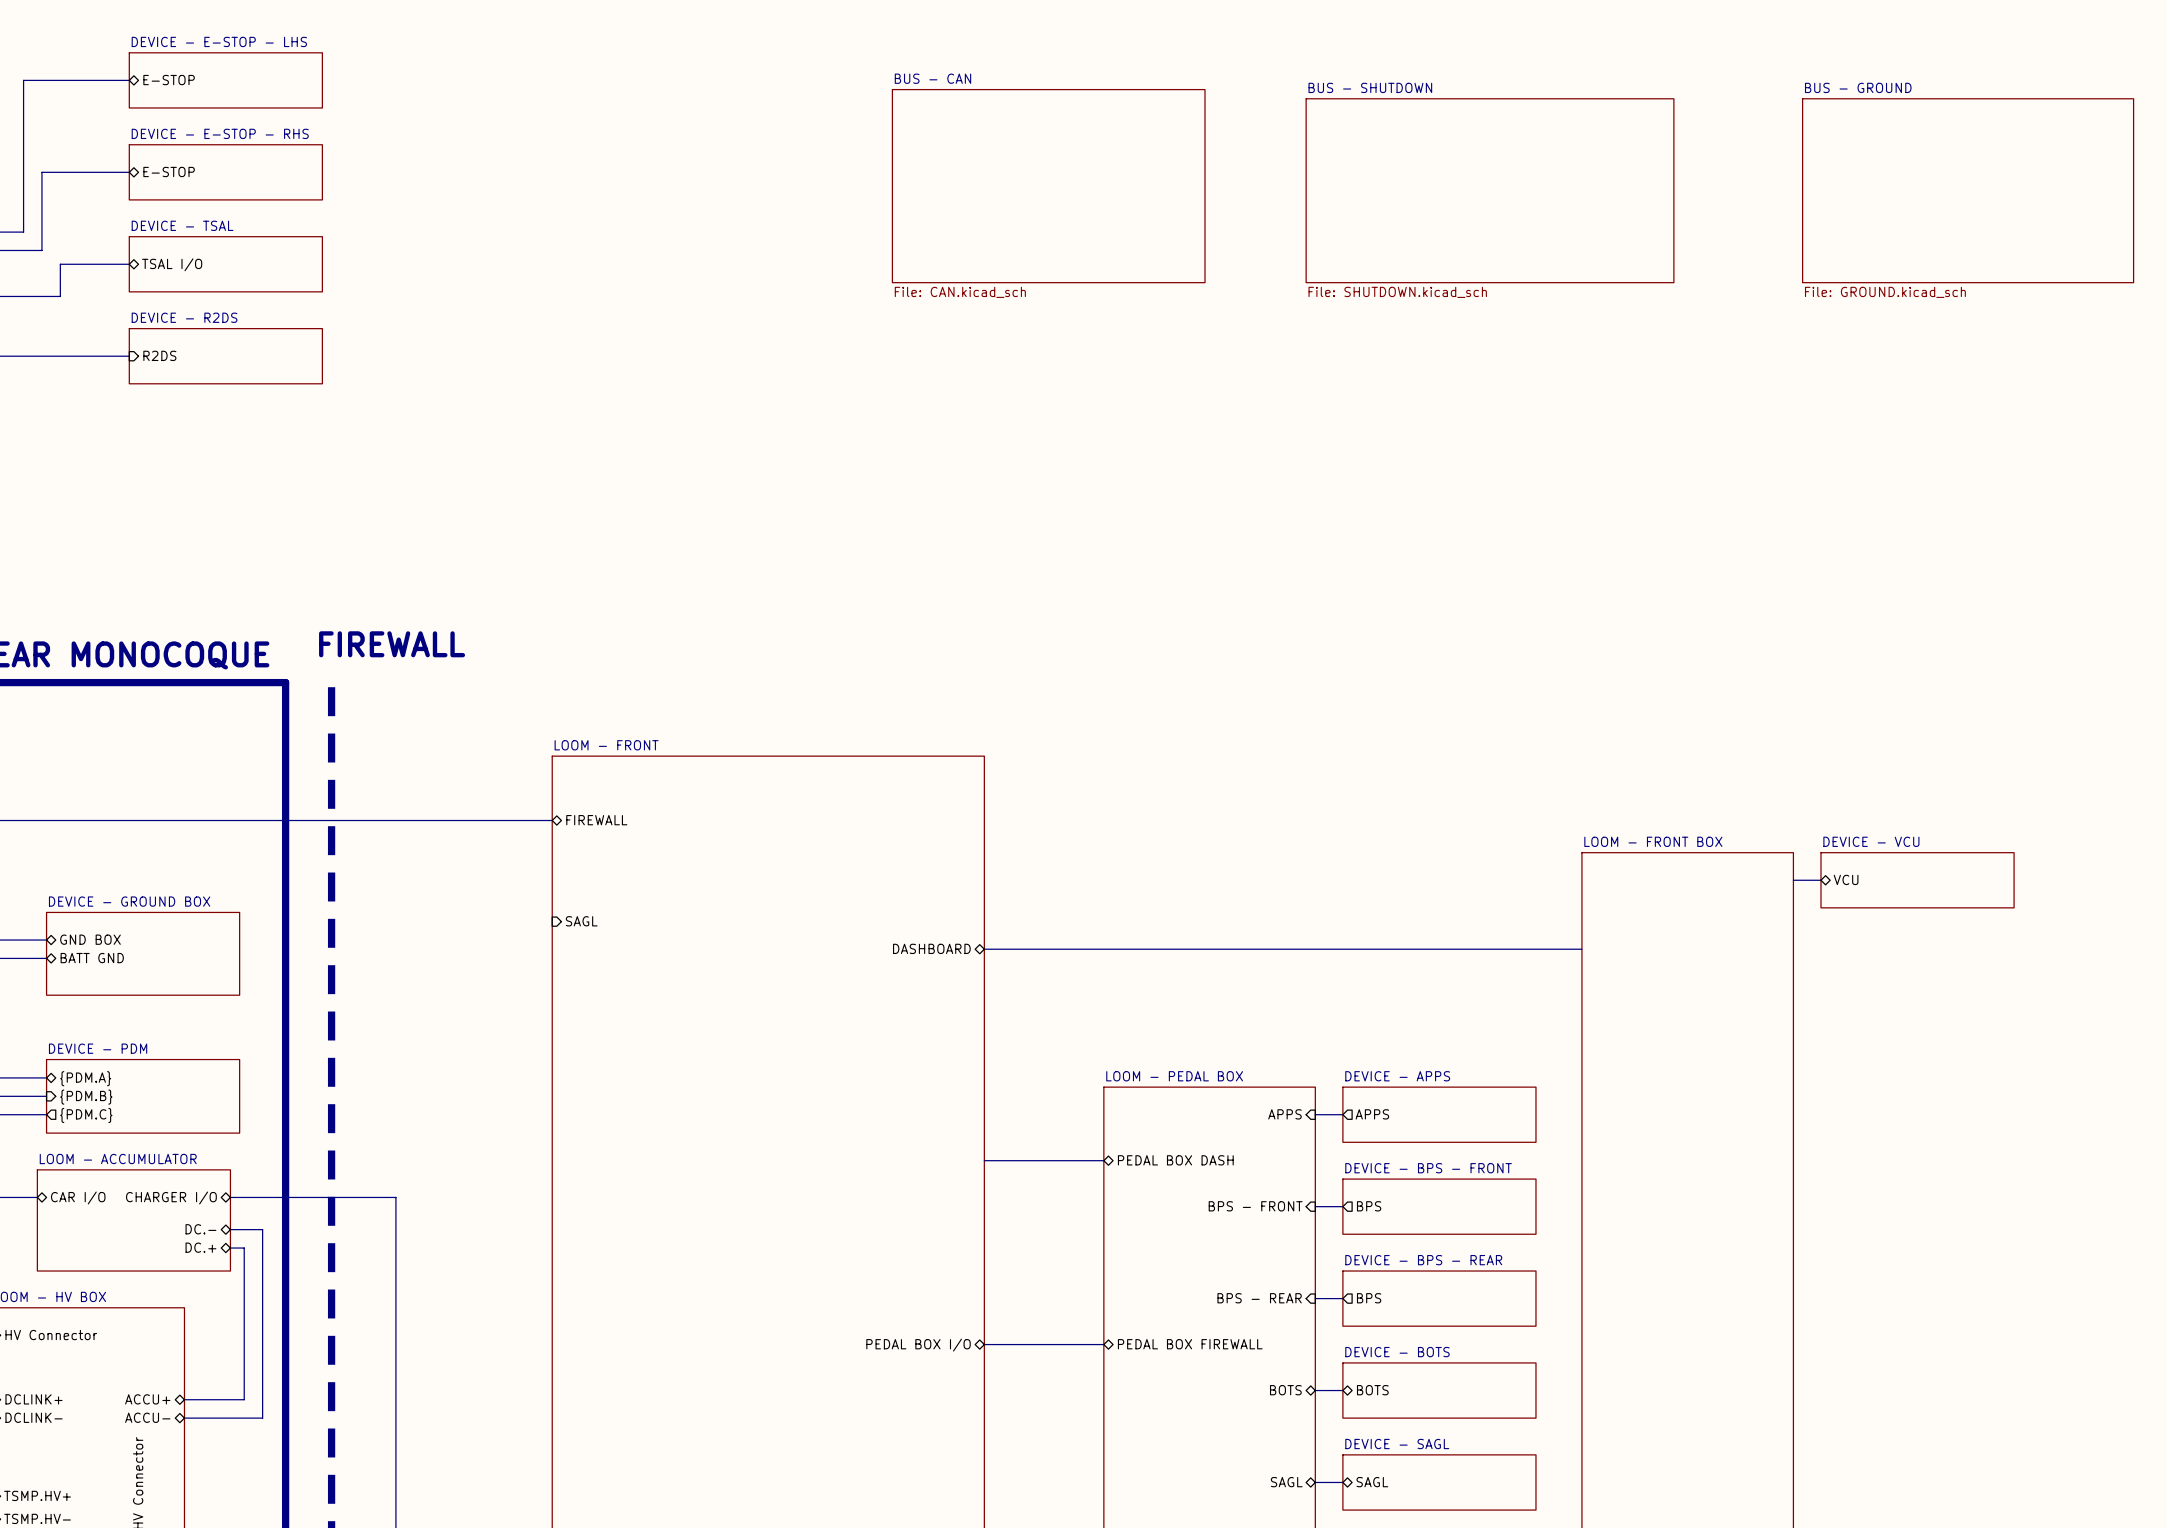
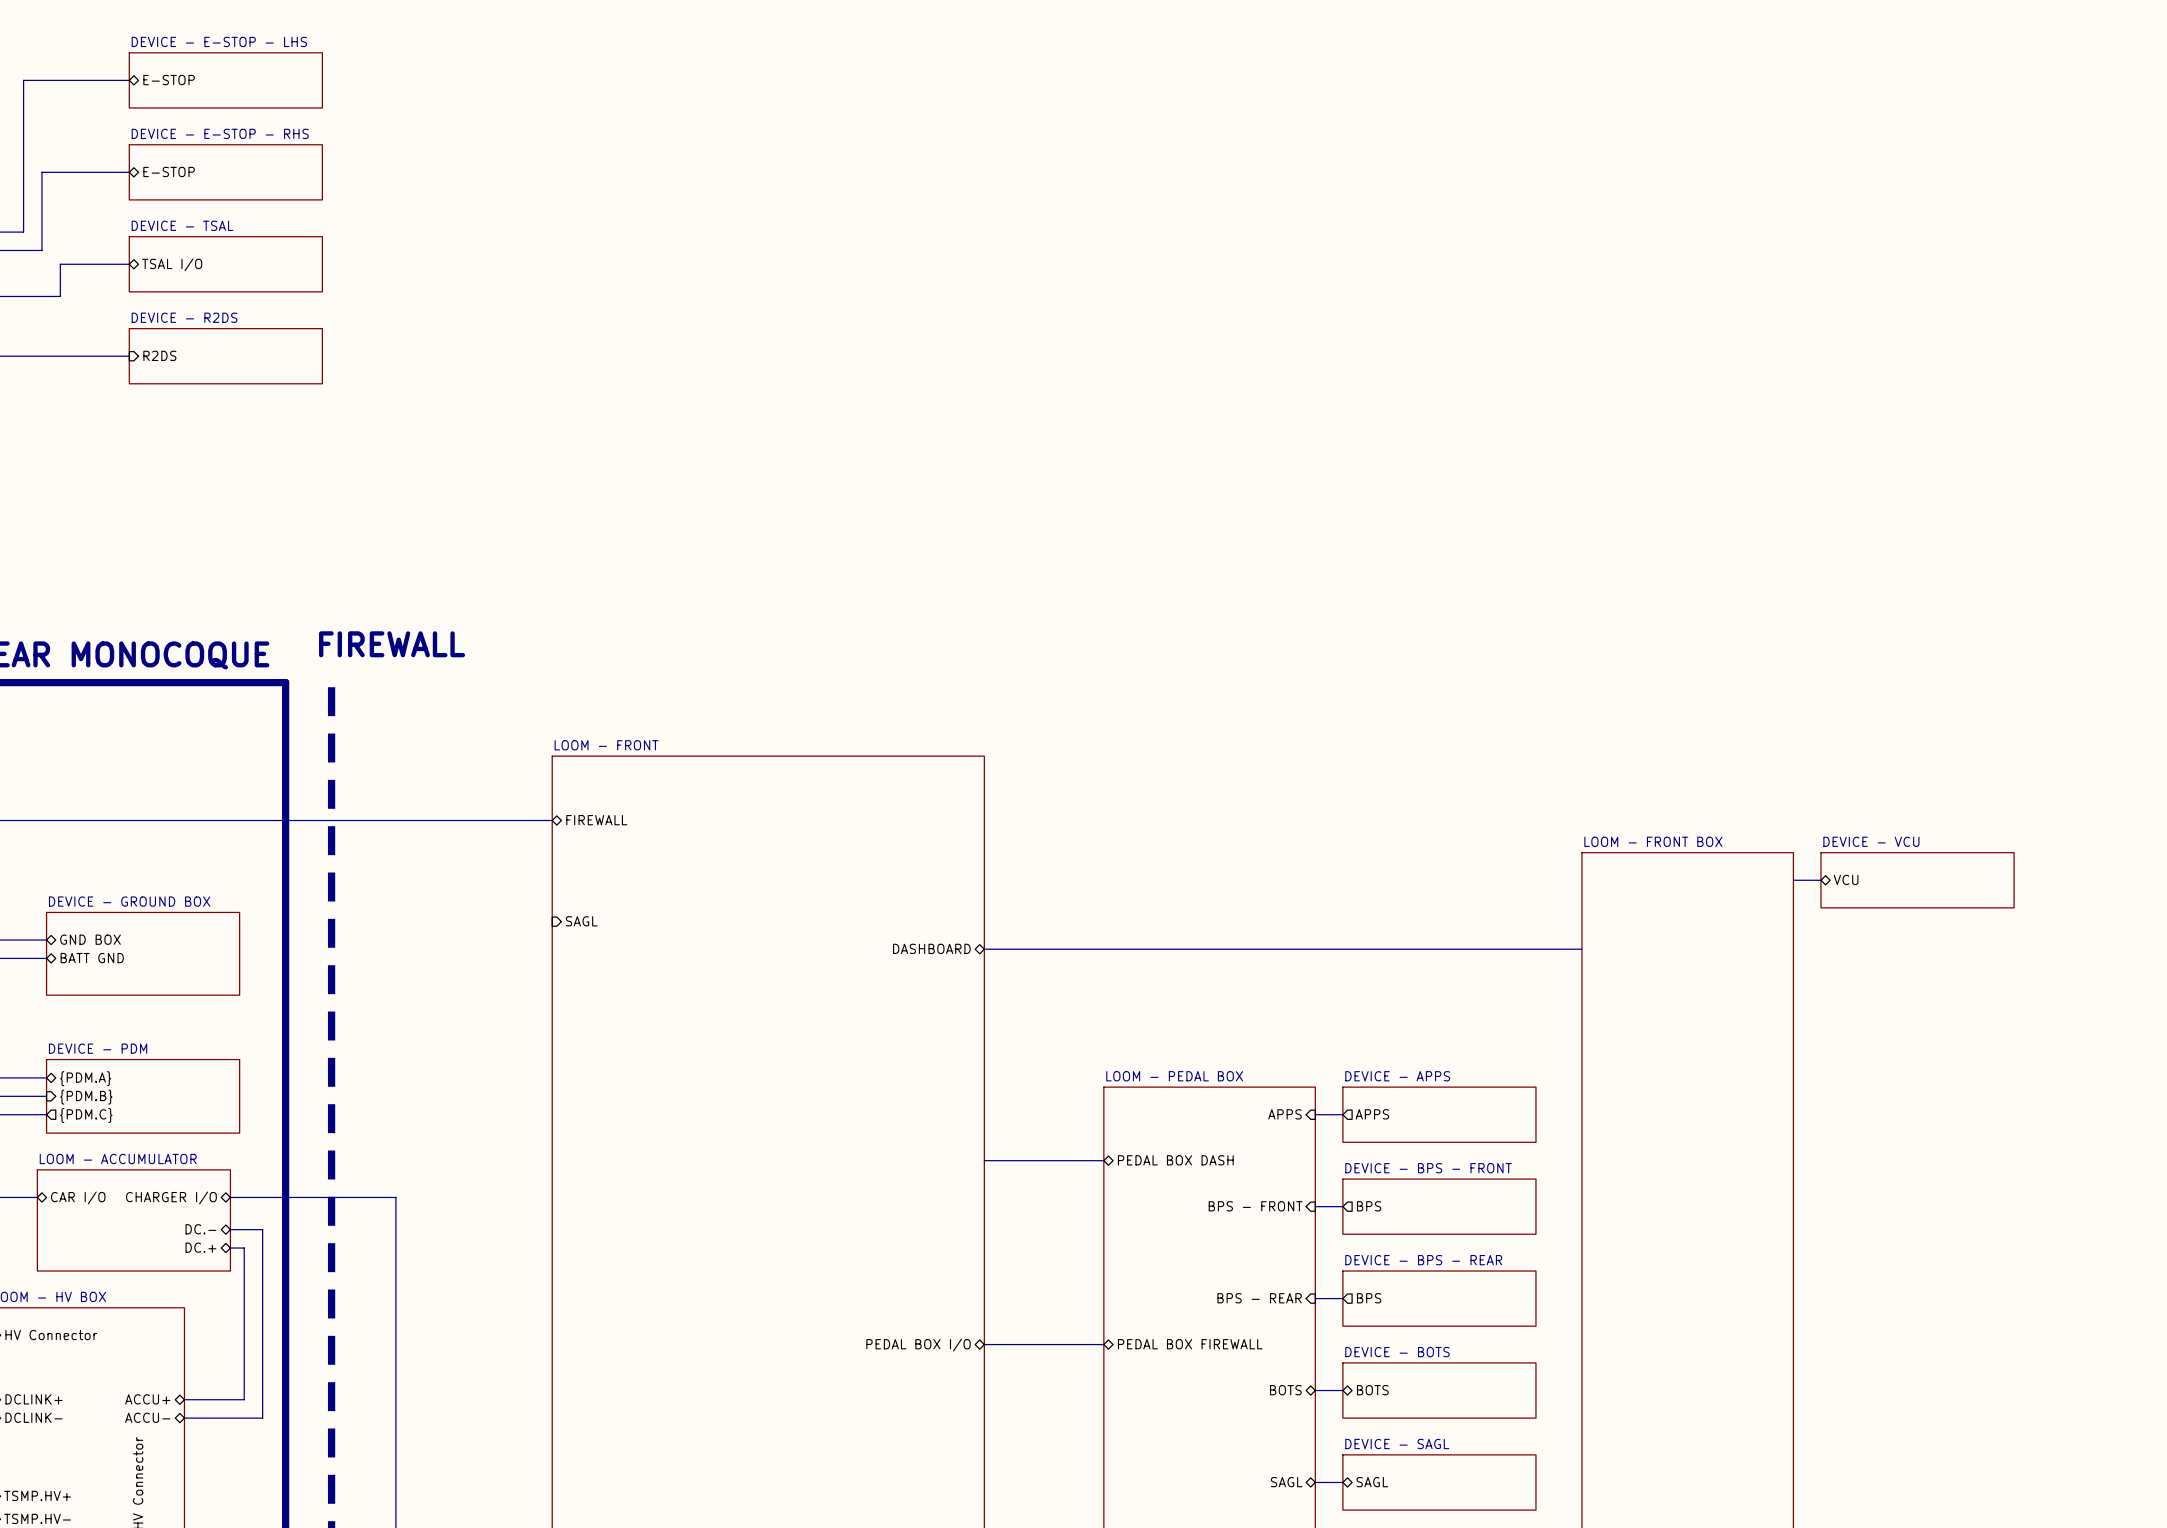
sheet BUS - CAN: File: CAN.kicad_sch (1048, 186) -> none
sheet BUS - SHUTDOWN: File: SHUTDOWN.kicad_sch (1490, 190) -> none
sheet BUS - GROUND: File: GROUND.kicad_sch (1968, 190) -> none

